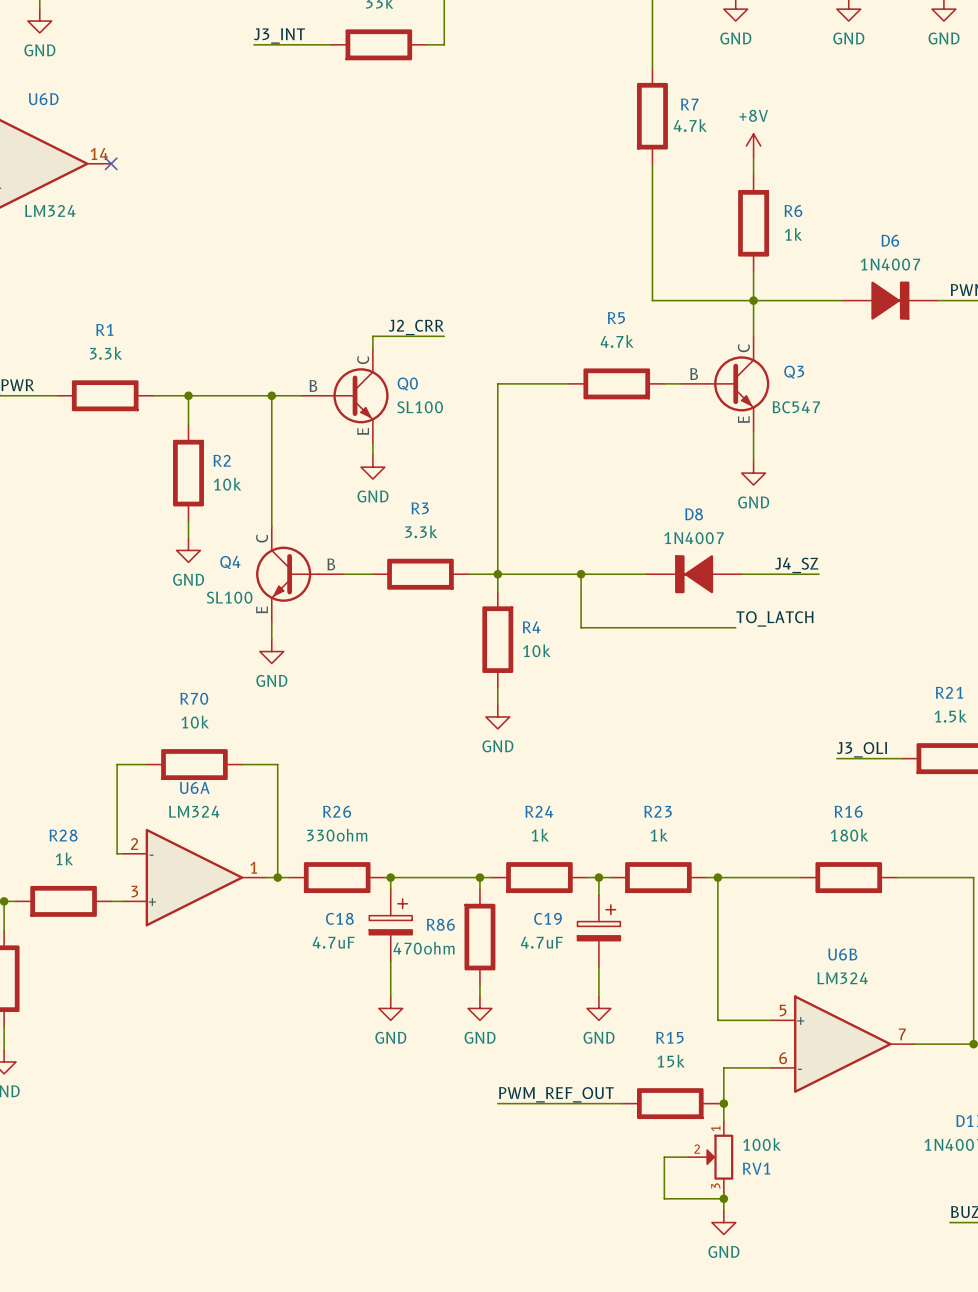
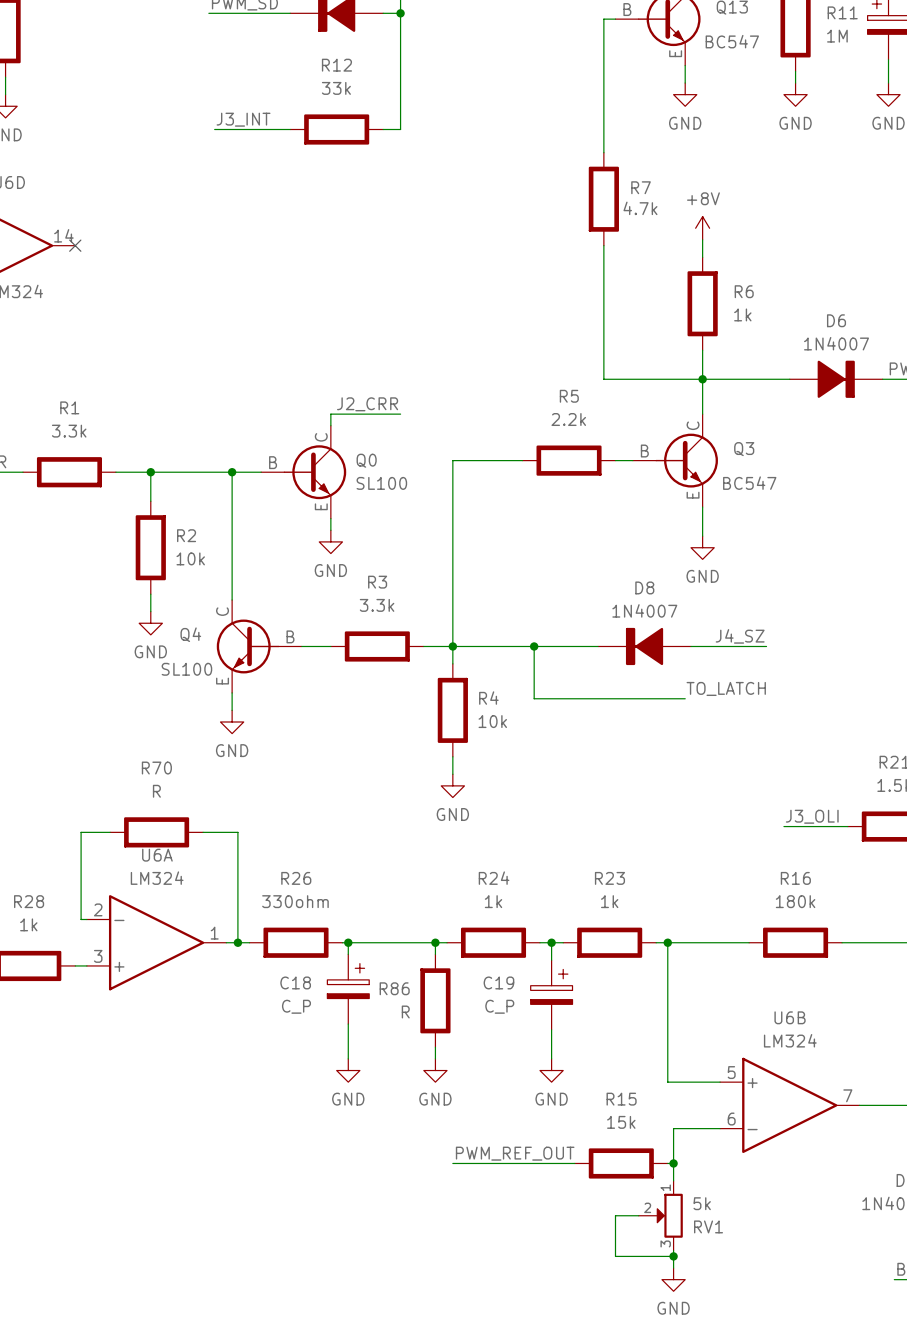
R5 value: 4.7k (617, 341) -> 2.2k (568, 419)
R70 value: 10k (195, 722) -> R (156, 791)
C18 value: 4.7uF (333, 942) -> C_P (296, 1006)
C19 value: 4.7uF (541, 942) -> C_P (499, 1006)
R86 value: 470ohm (424, 948) -> R (405, 1012)
RV1 value: 100k (762, 1144) -> 5k (702, 1203)

